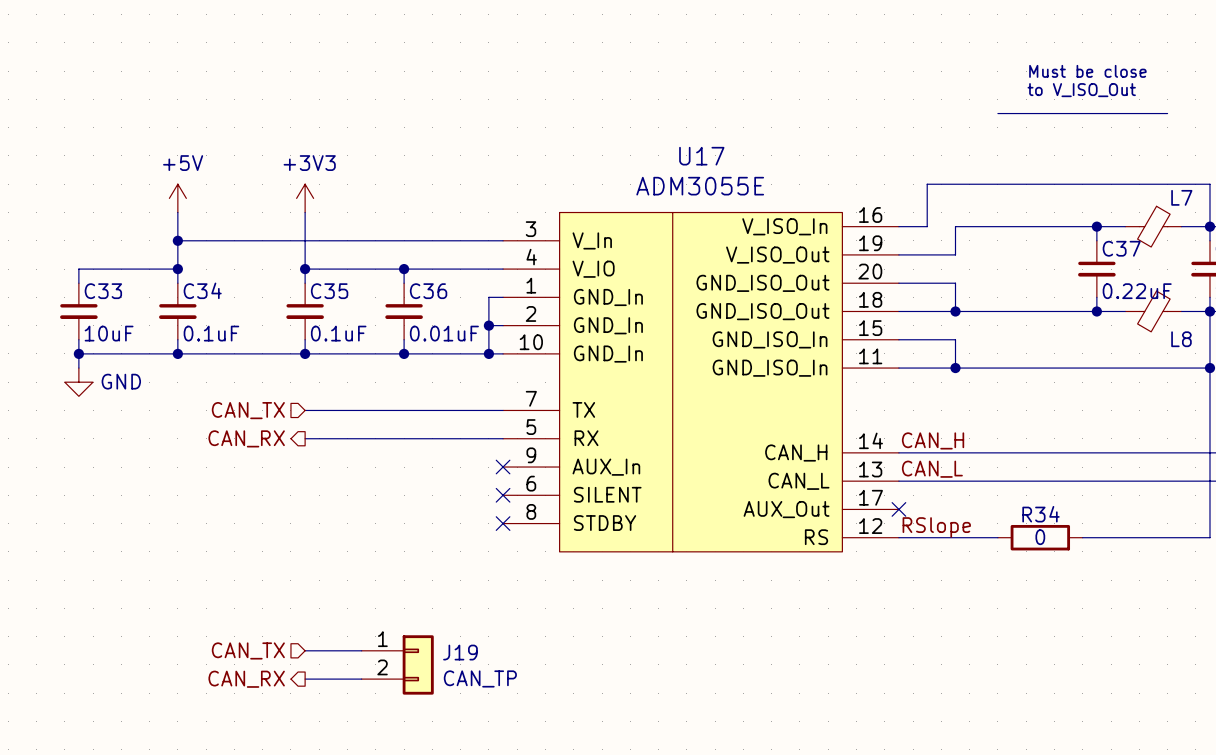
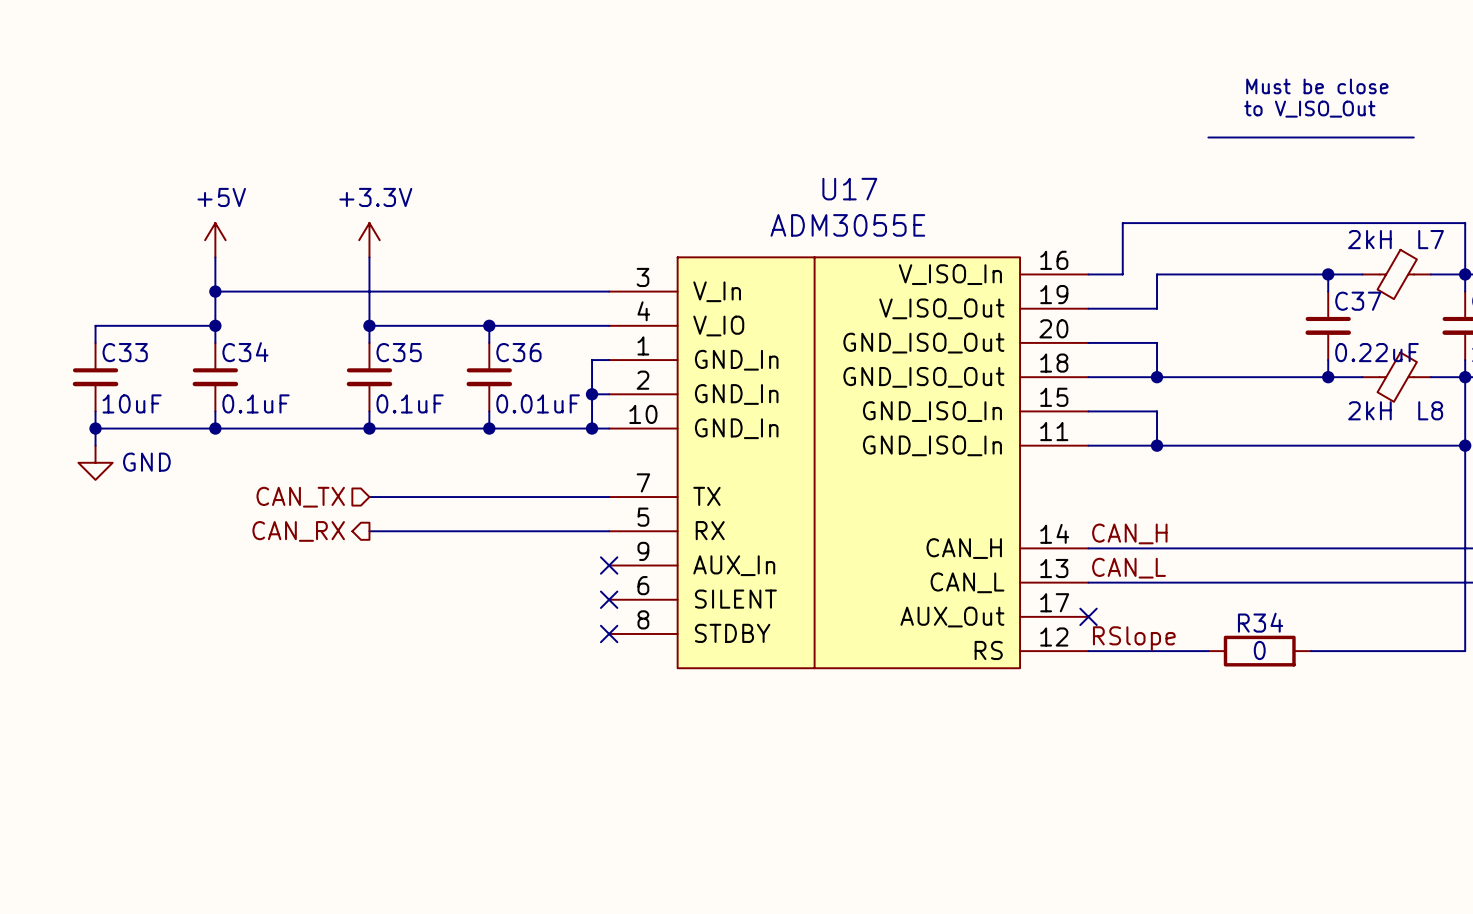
L7 value: none -> 2kH (1369, 239)
power symbol: +3V3 (305, 198) -> +3.3V (369, 240)
L8 value: none -> 2kH (1369, 410)
hierarchical label: CAN_TX (248, 650) -> none
wire: (305, 650) (361, 650) -> none
J19: CAN_TP (397, 664) -> none
hierarchical label: CAN_RX (246, 679) -> none
wire: (305, 679) (361, 679) -> none

